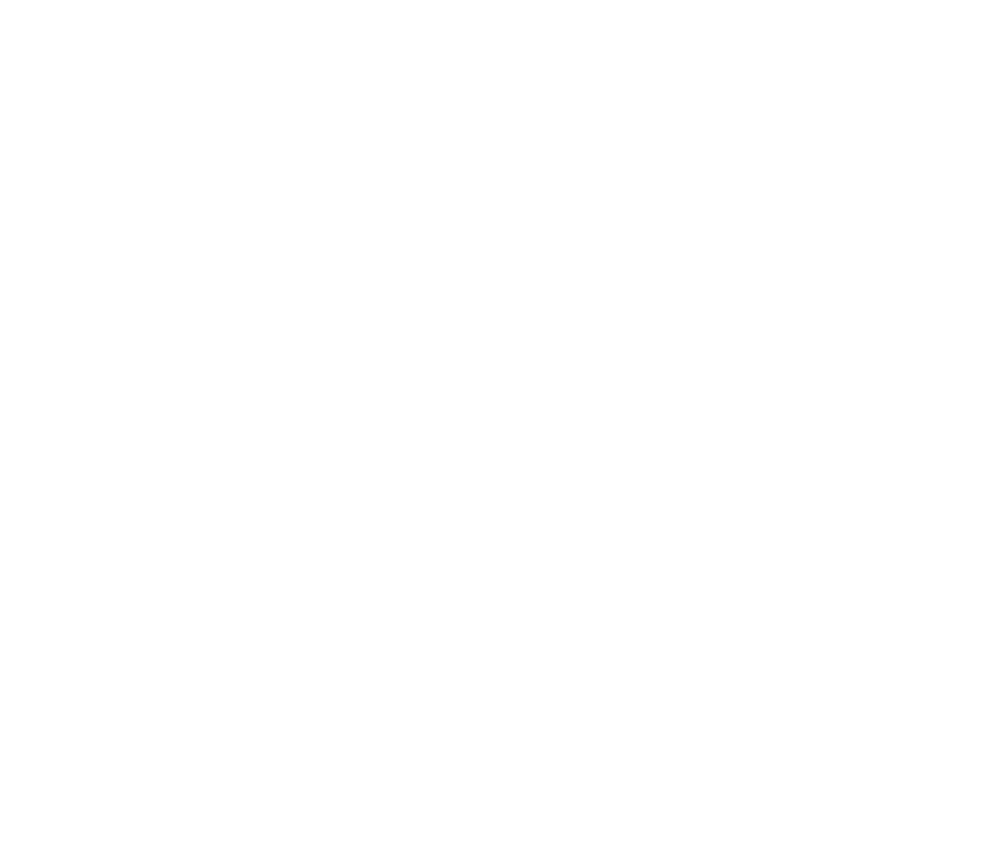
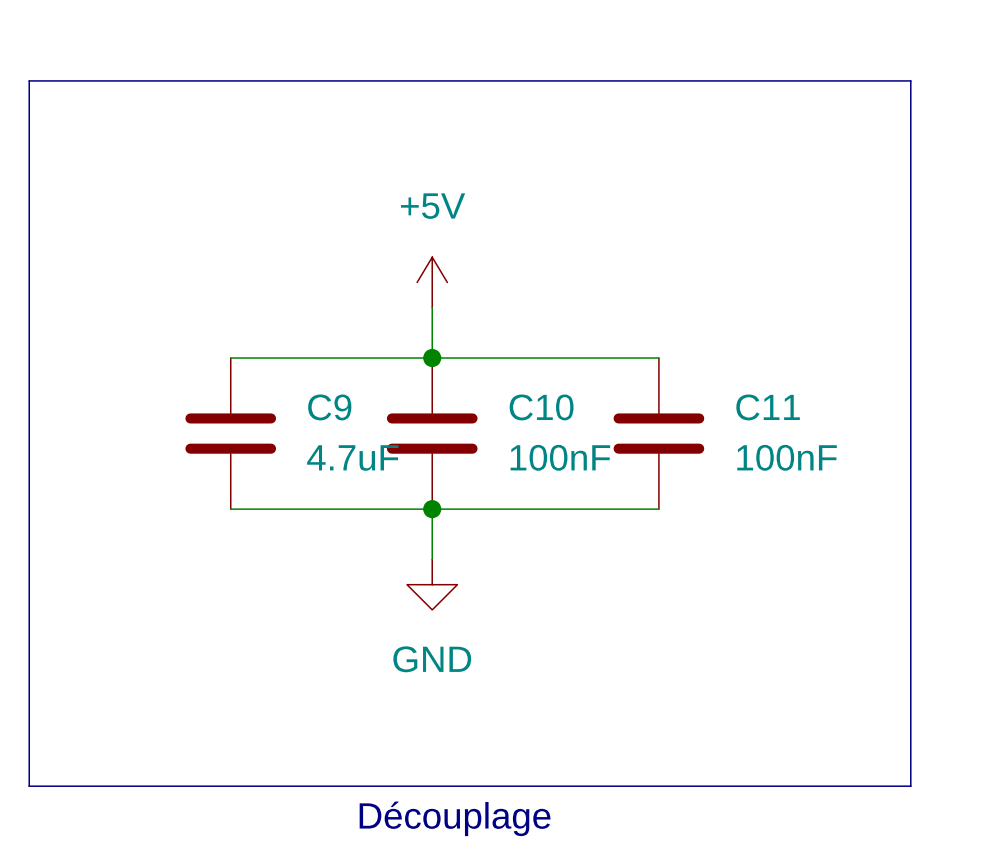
line: none -> (29, 80) (910, 80) (910, 786) (29, 786) (29, 80)
power symbol: none -> +5V (432, 282)
wire: none -> (432, 307) (432, 358)
wire: none -> (230, 358) (658, 358)
junction: none -> (432, 358)
C9: none -> 4.7uF (230, 433)
C10: none -> 100nF (432, 433)
C11: none -> 100nF (658, 433)
wire: none -> (230, 509) (658, 509)
wire: none -> (432, 509) (432, 559)
junction: none -> (432, 509)
power symbol: none -> GND (432, 584)
text: none -> Découplage (455, 818)

